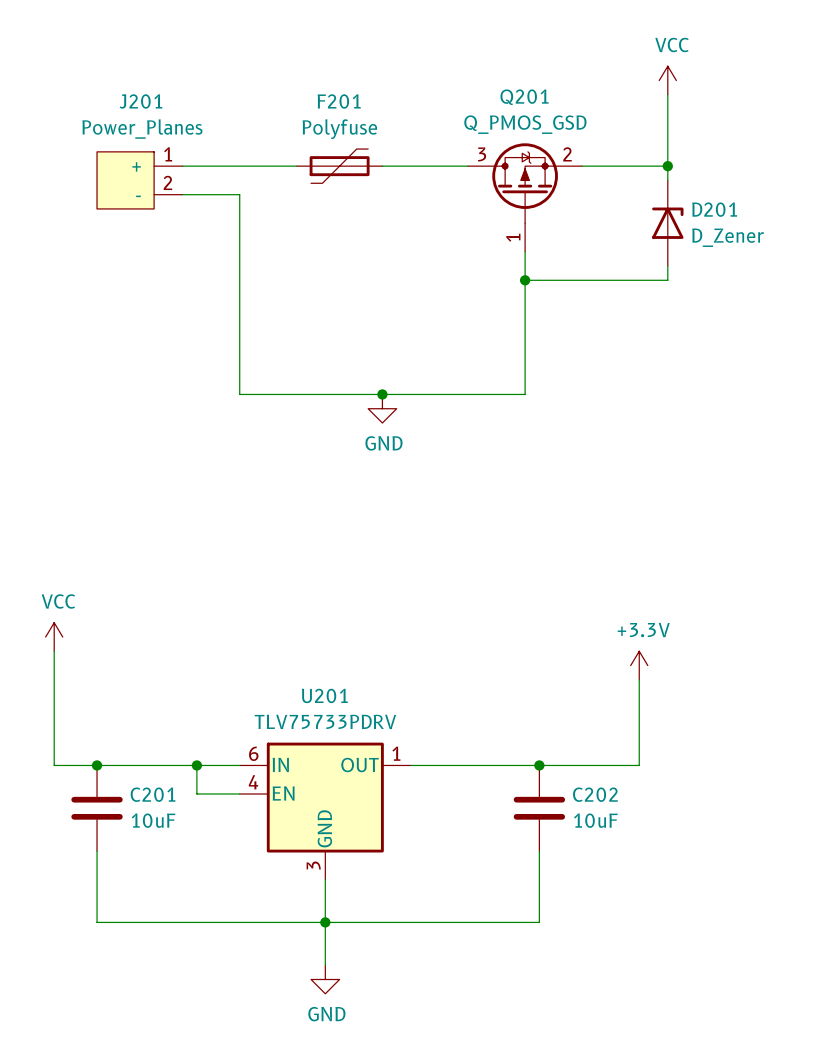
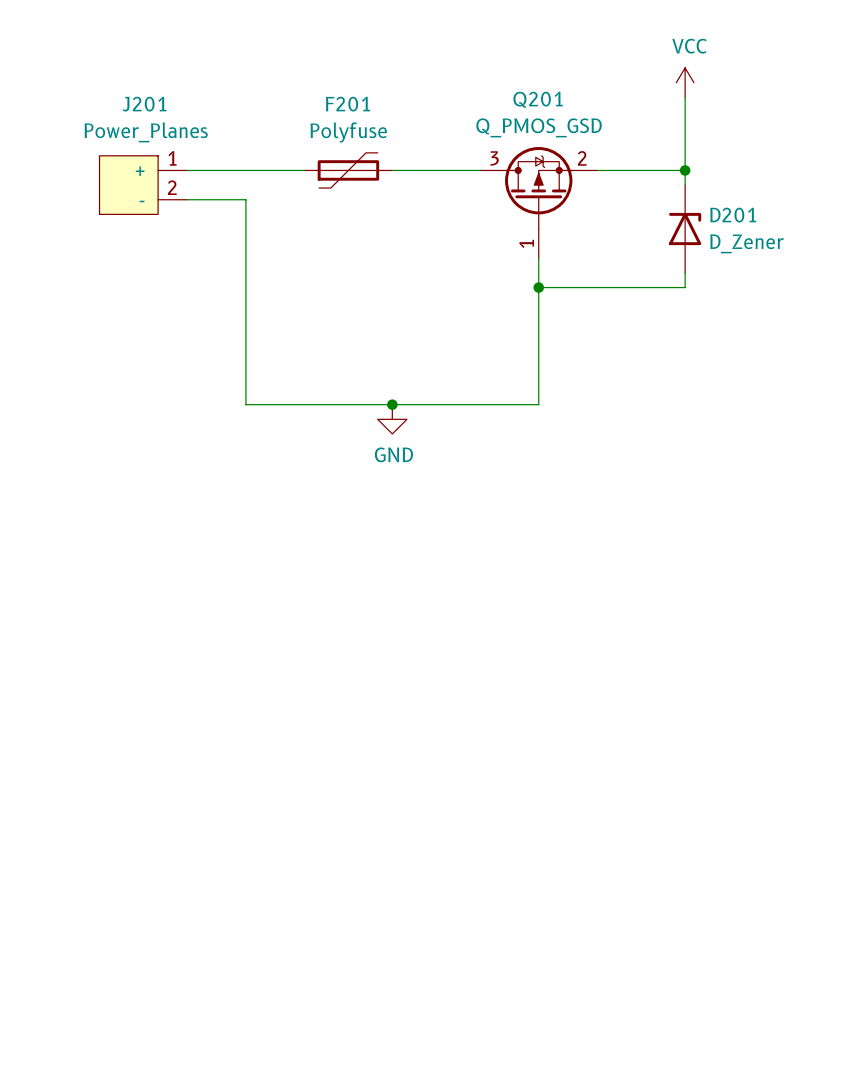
power symbol: VCC (54, 637) -> none
wire: (54, 651) (54, 765) (239, 765) -> none
power symbol: +3.3V (639, 665) -> none
wire: (639, 679) (639, 765) (410, 765) -> none
junction: (97, 765) -> none
wire: (196, 765) (196, 794) (239, 794) -> none
junction: (196, 765) -> none
junction: (539, 765) -> none
C201: 10uF (97, 808) -> none
C202: 10uF (539, 808) -> none
U201: TLV75733PDRV (325, 811) -> none
wire: (97, 851) (97, 922) (539, 922) (539, 851) -> none
wire: (325, 879) (325, 965) -> none
junction: (325, 922) -> none
power symbol: GND (325, 979) -> none

